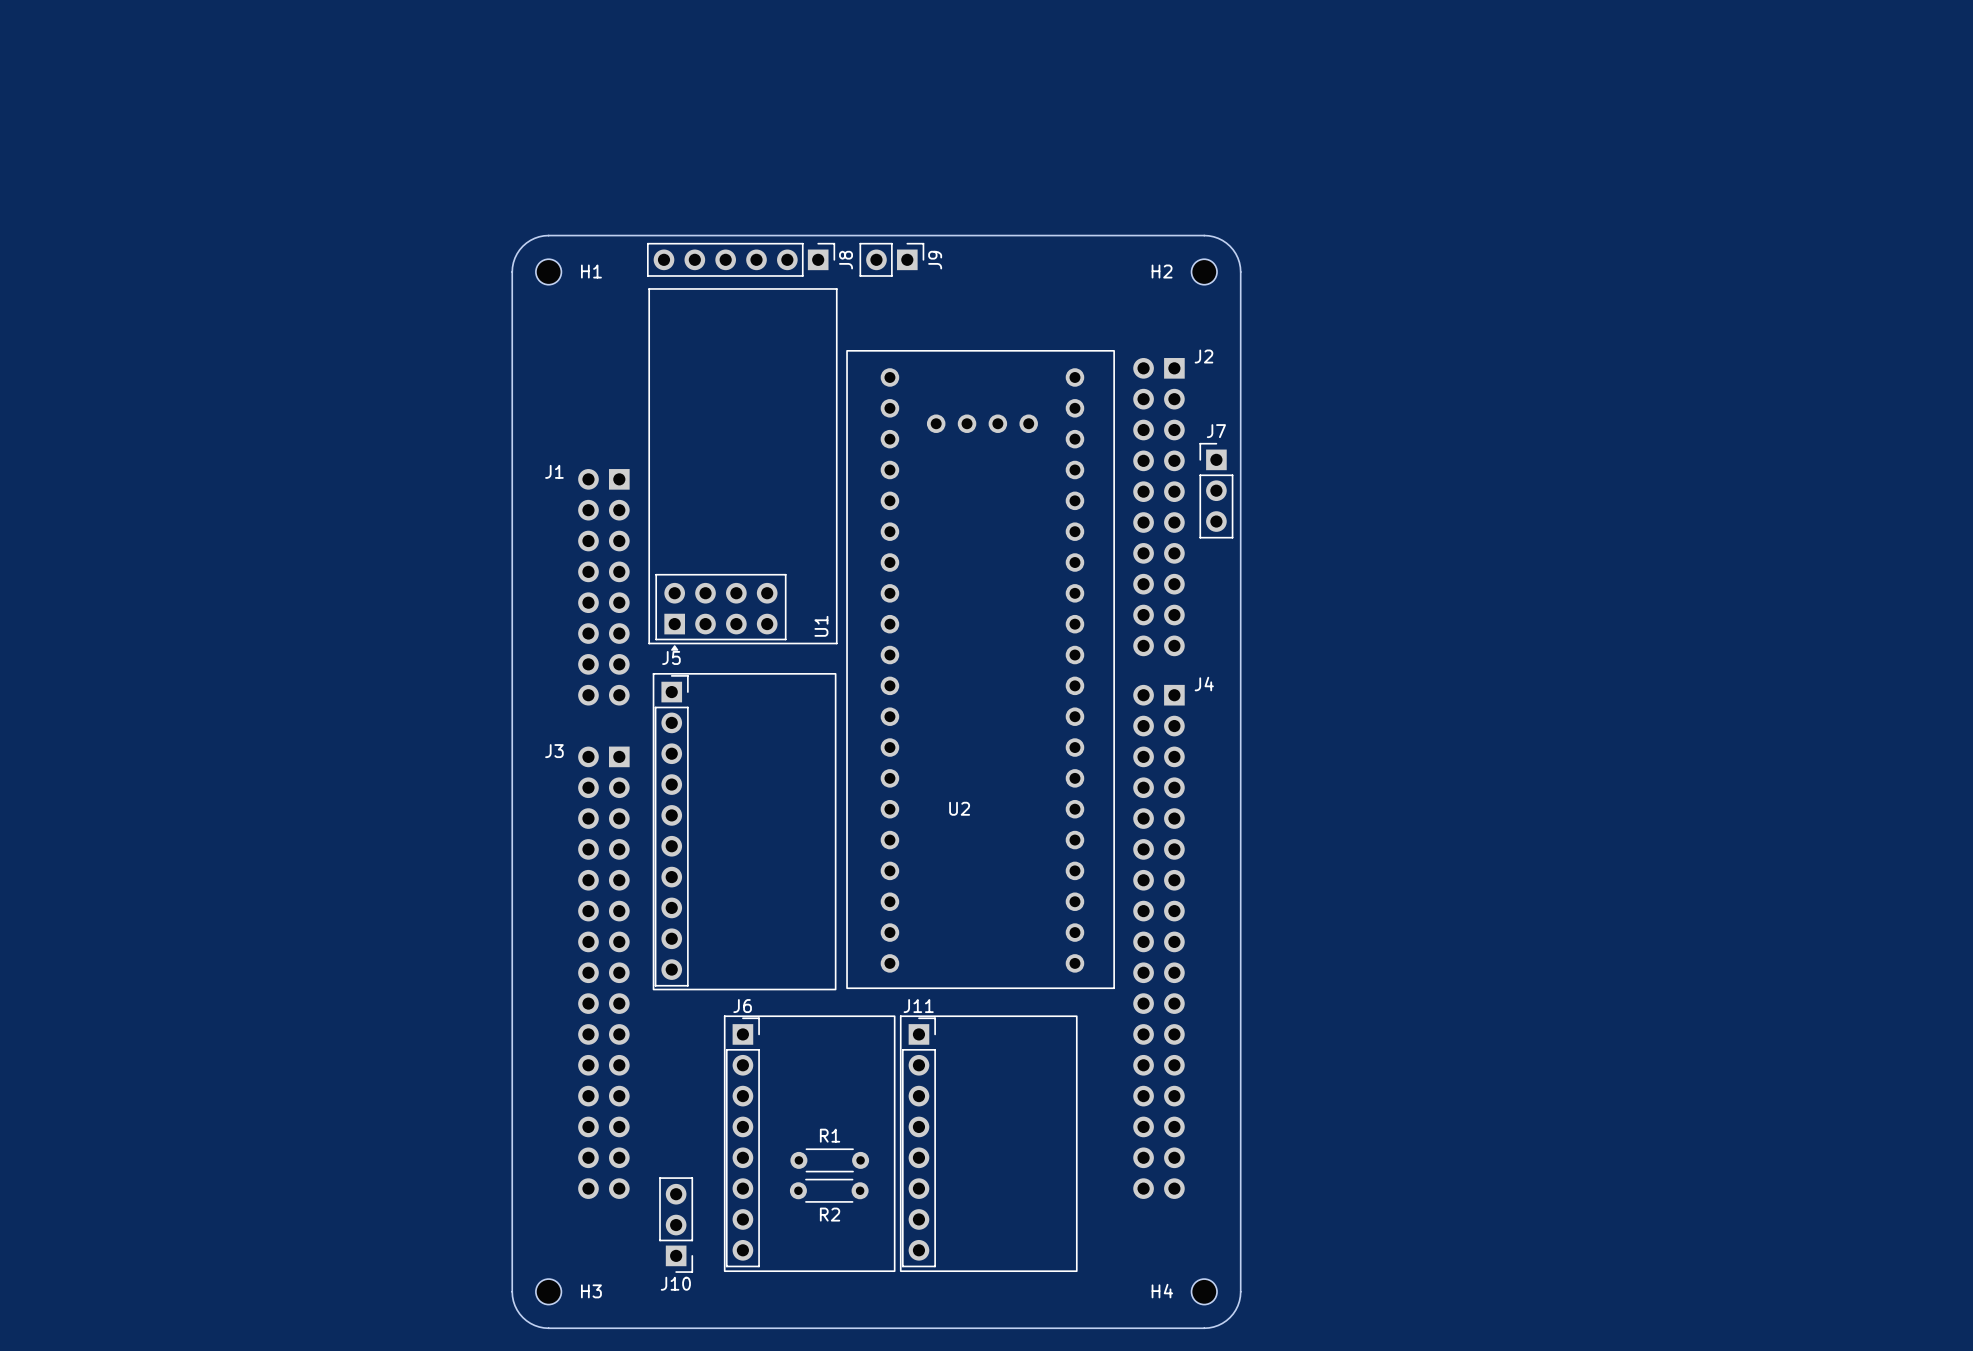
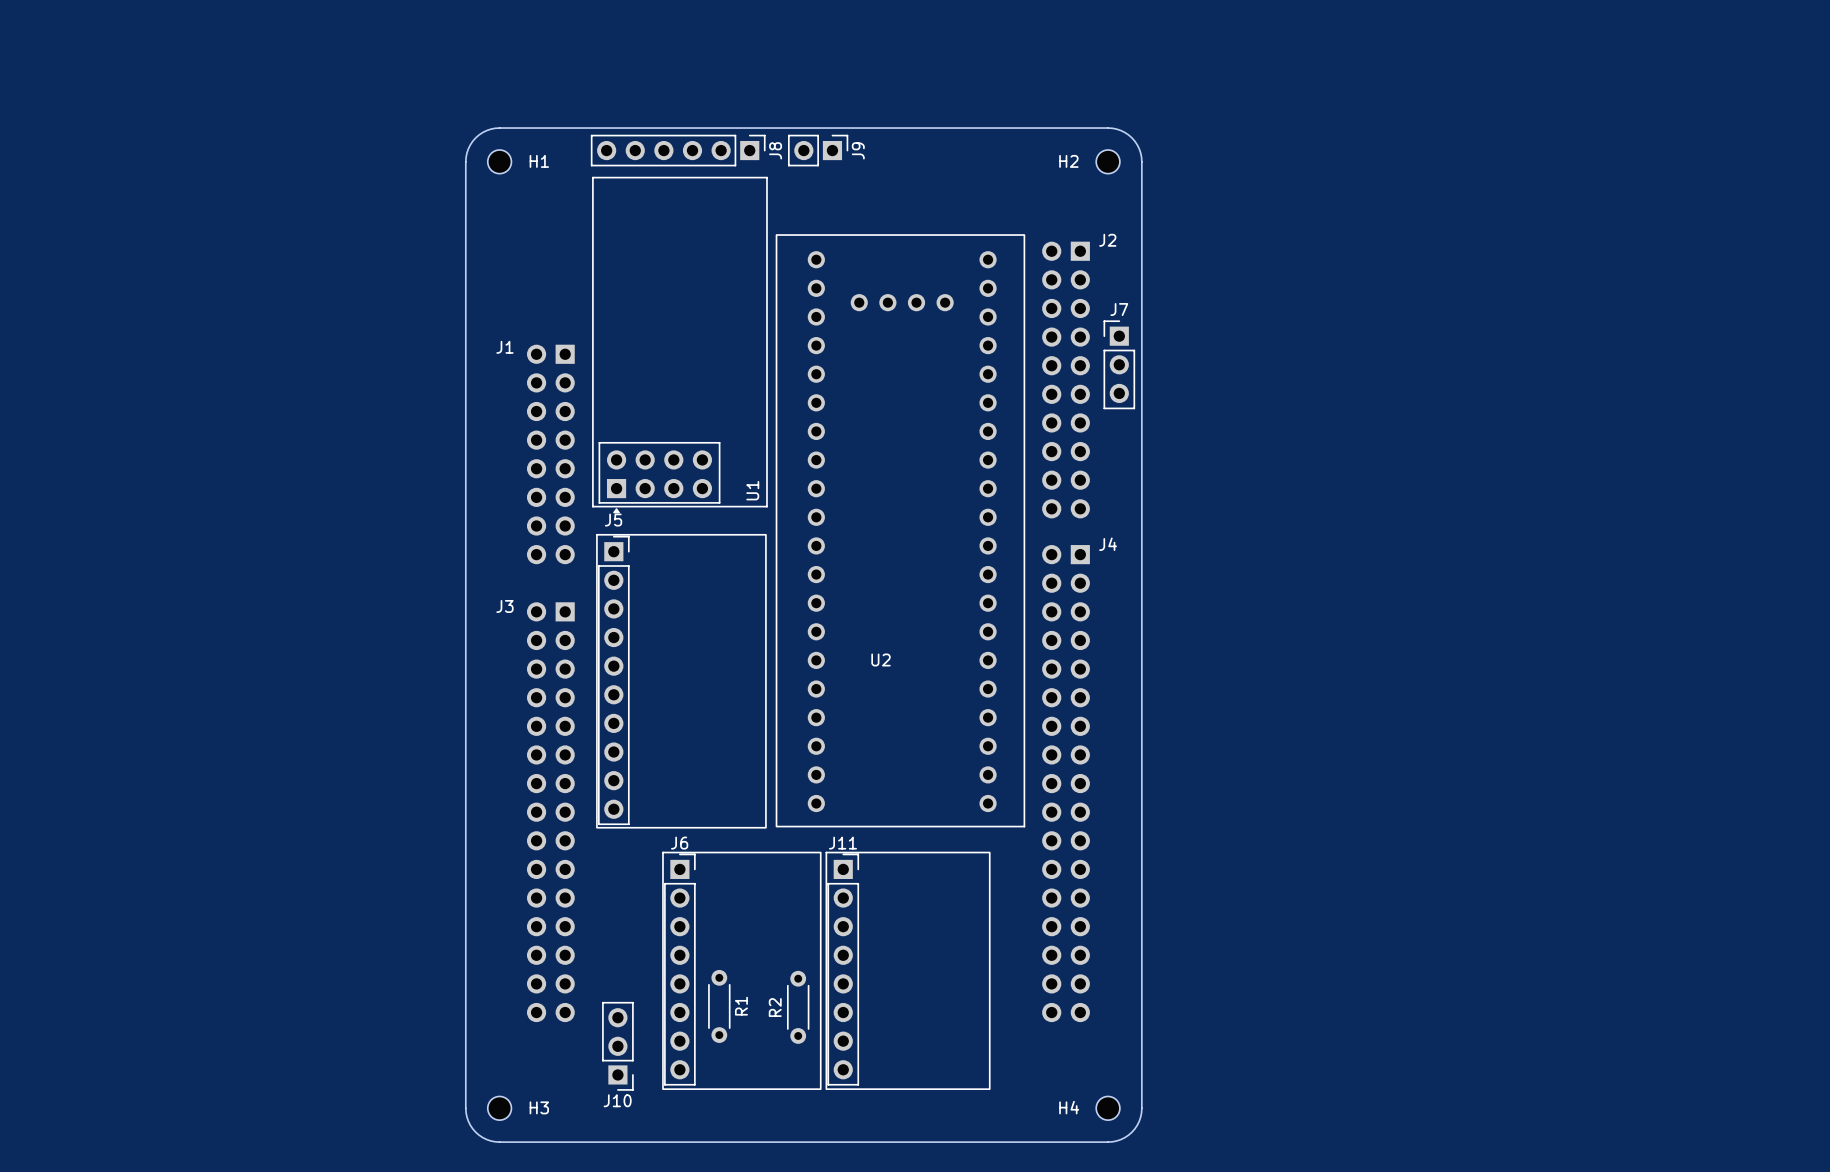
R1 rotation: 0° (829, 1160) -> 90° clockwise (719, 1006)
R1 position: (829, 1160) -> (719, 1006)
R2 rotation: 0° (829, 1190) -> 90° clockwise (798, 1007)

